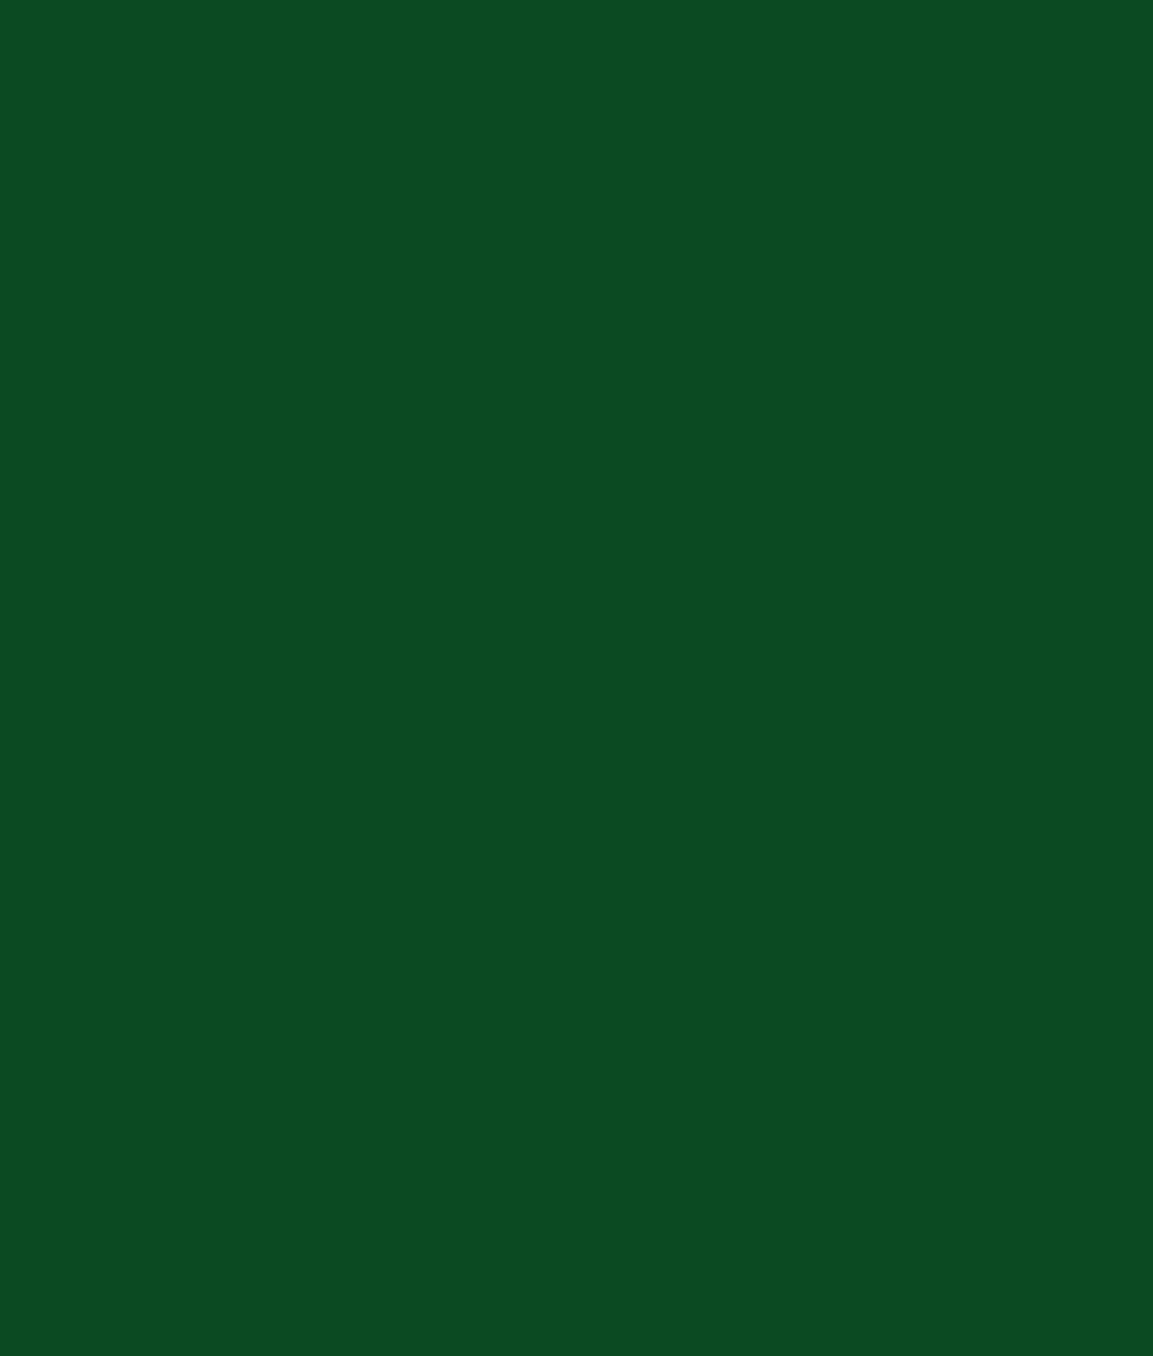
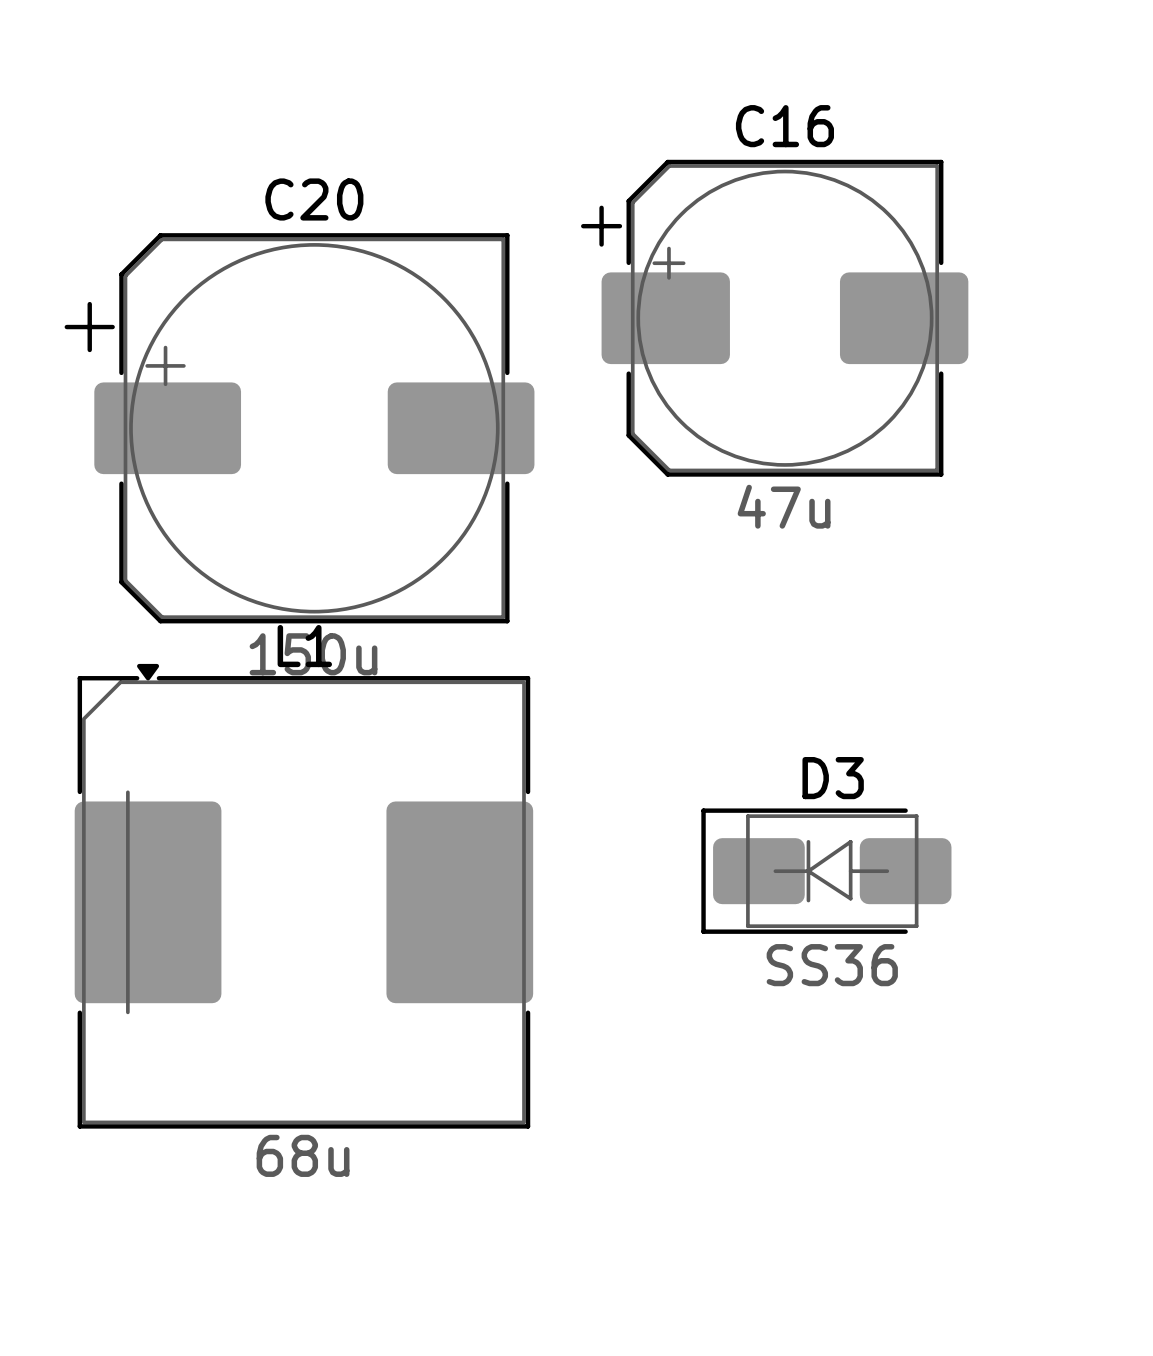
C16: none -> 47u (774, 318)
C20: none -> 150u (299, 428)
D3: none -> SS36 (826, 871)
L1: none -> 68u (303, 896)

